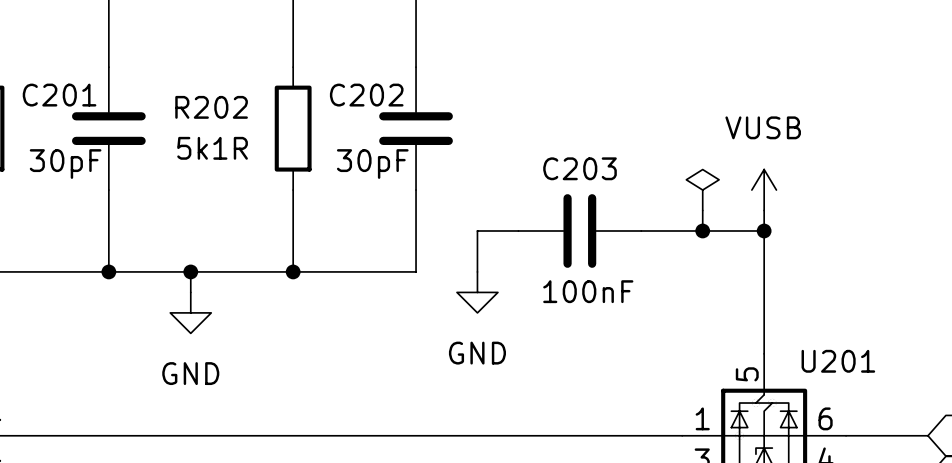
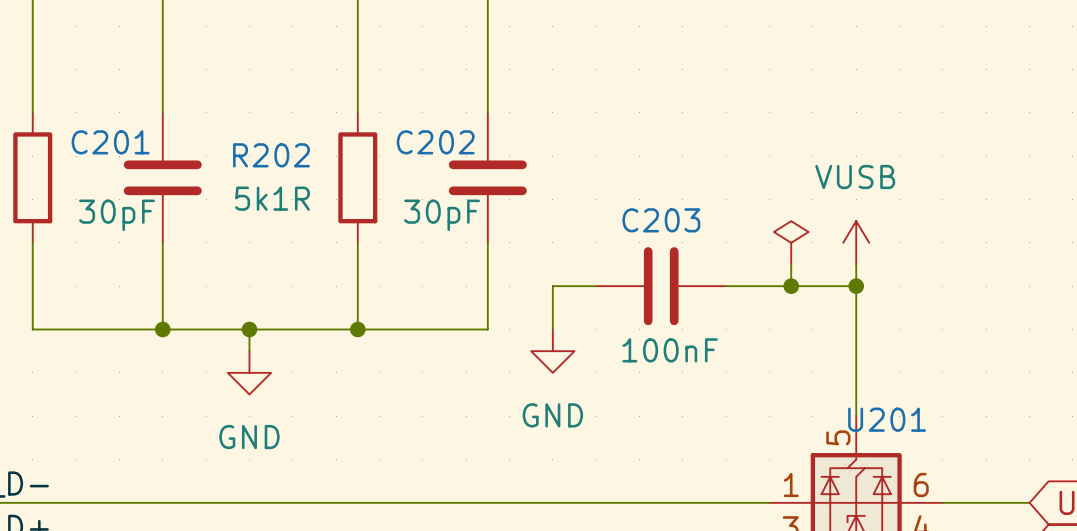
U201 name position: U201 (838, 361) -> U201 (887, 419)

